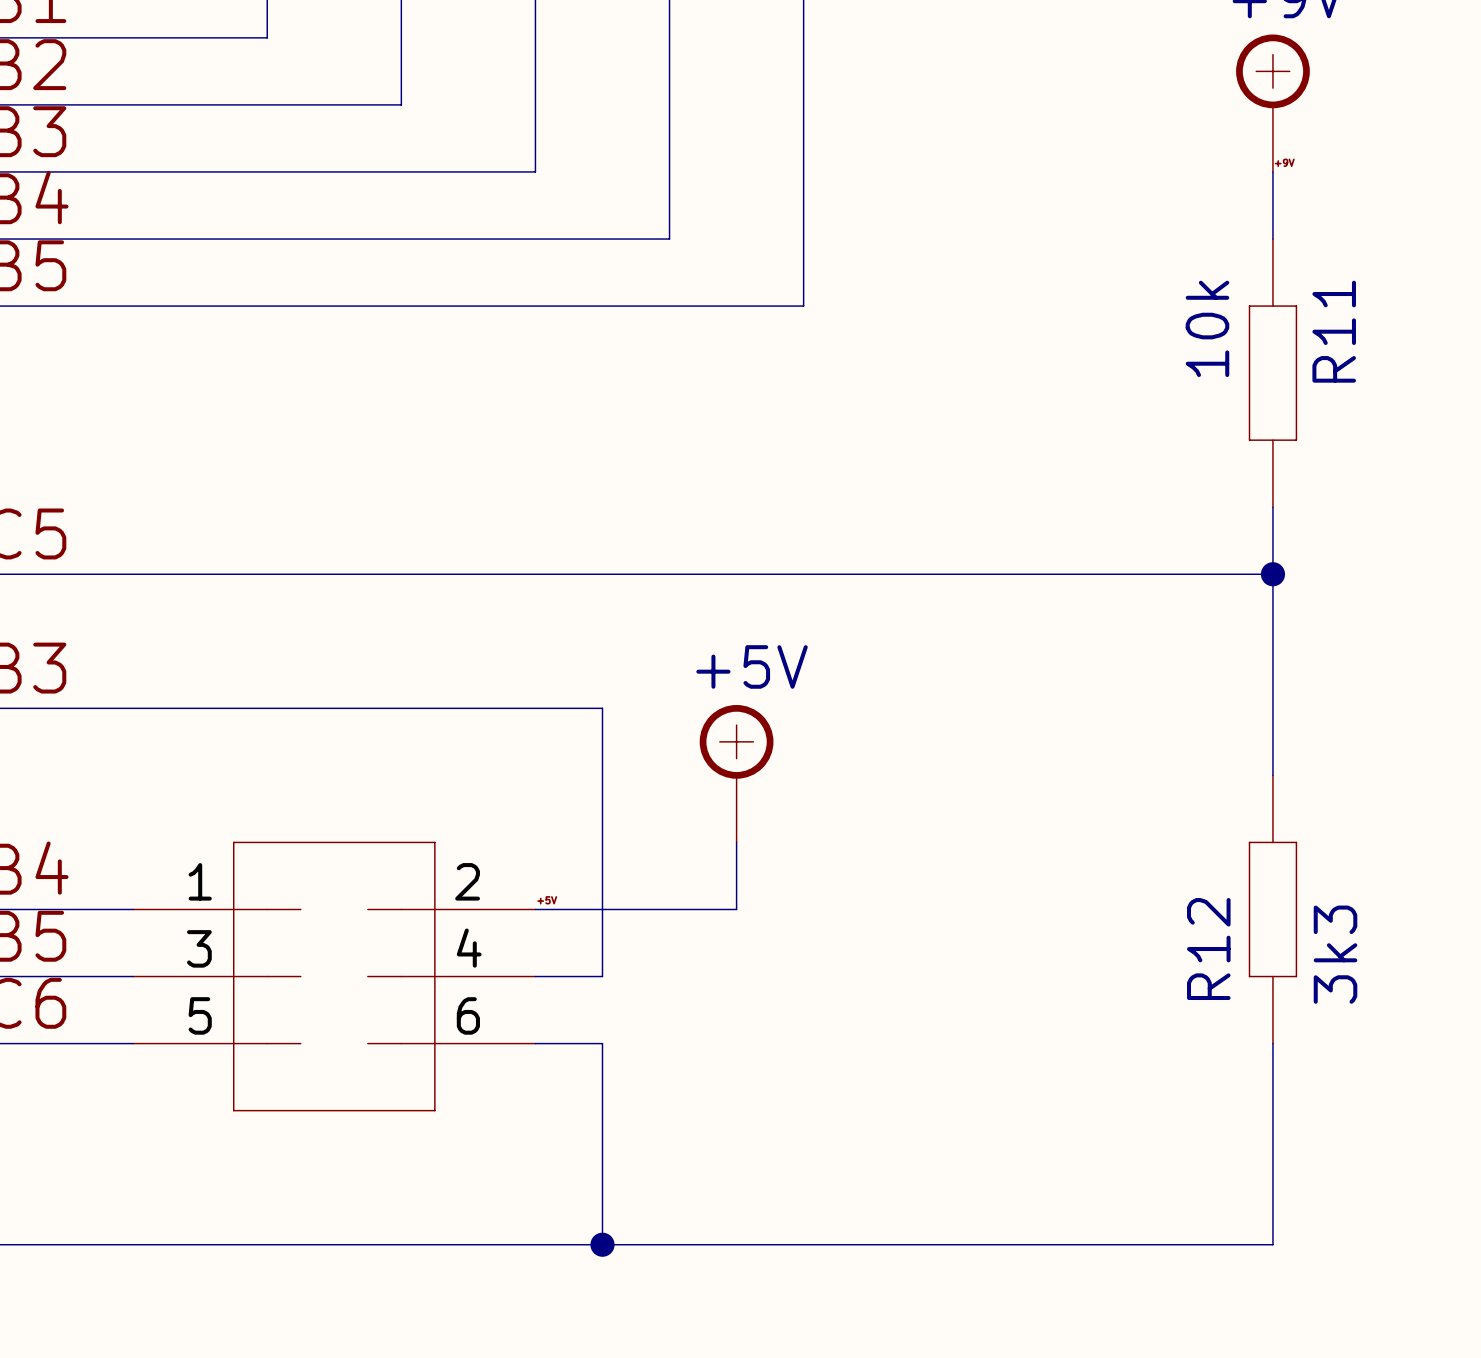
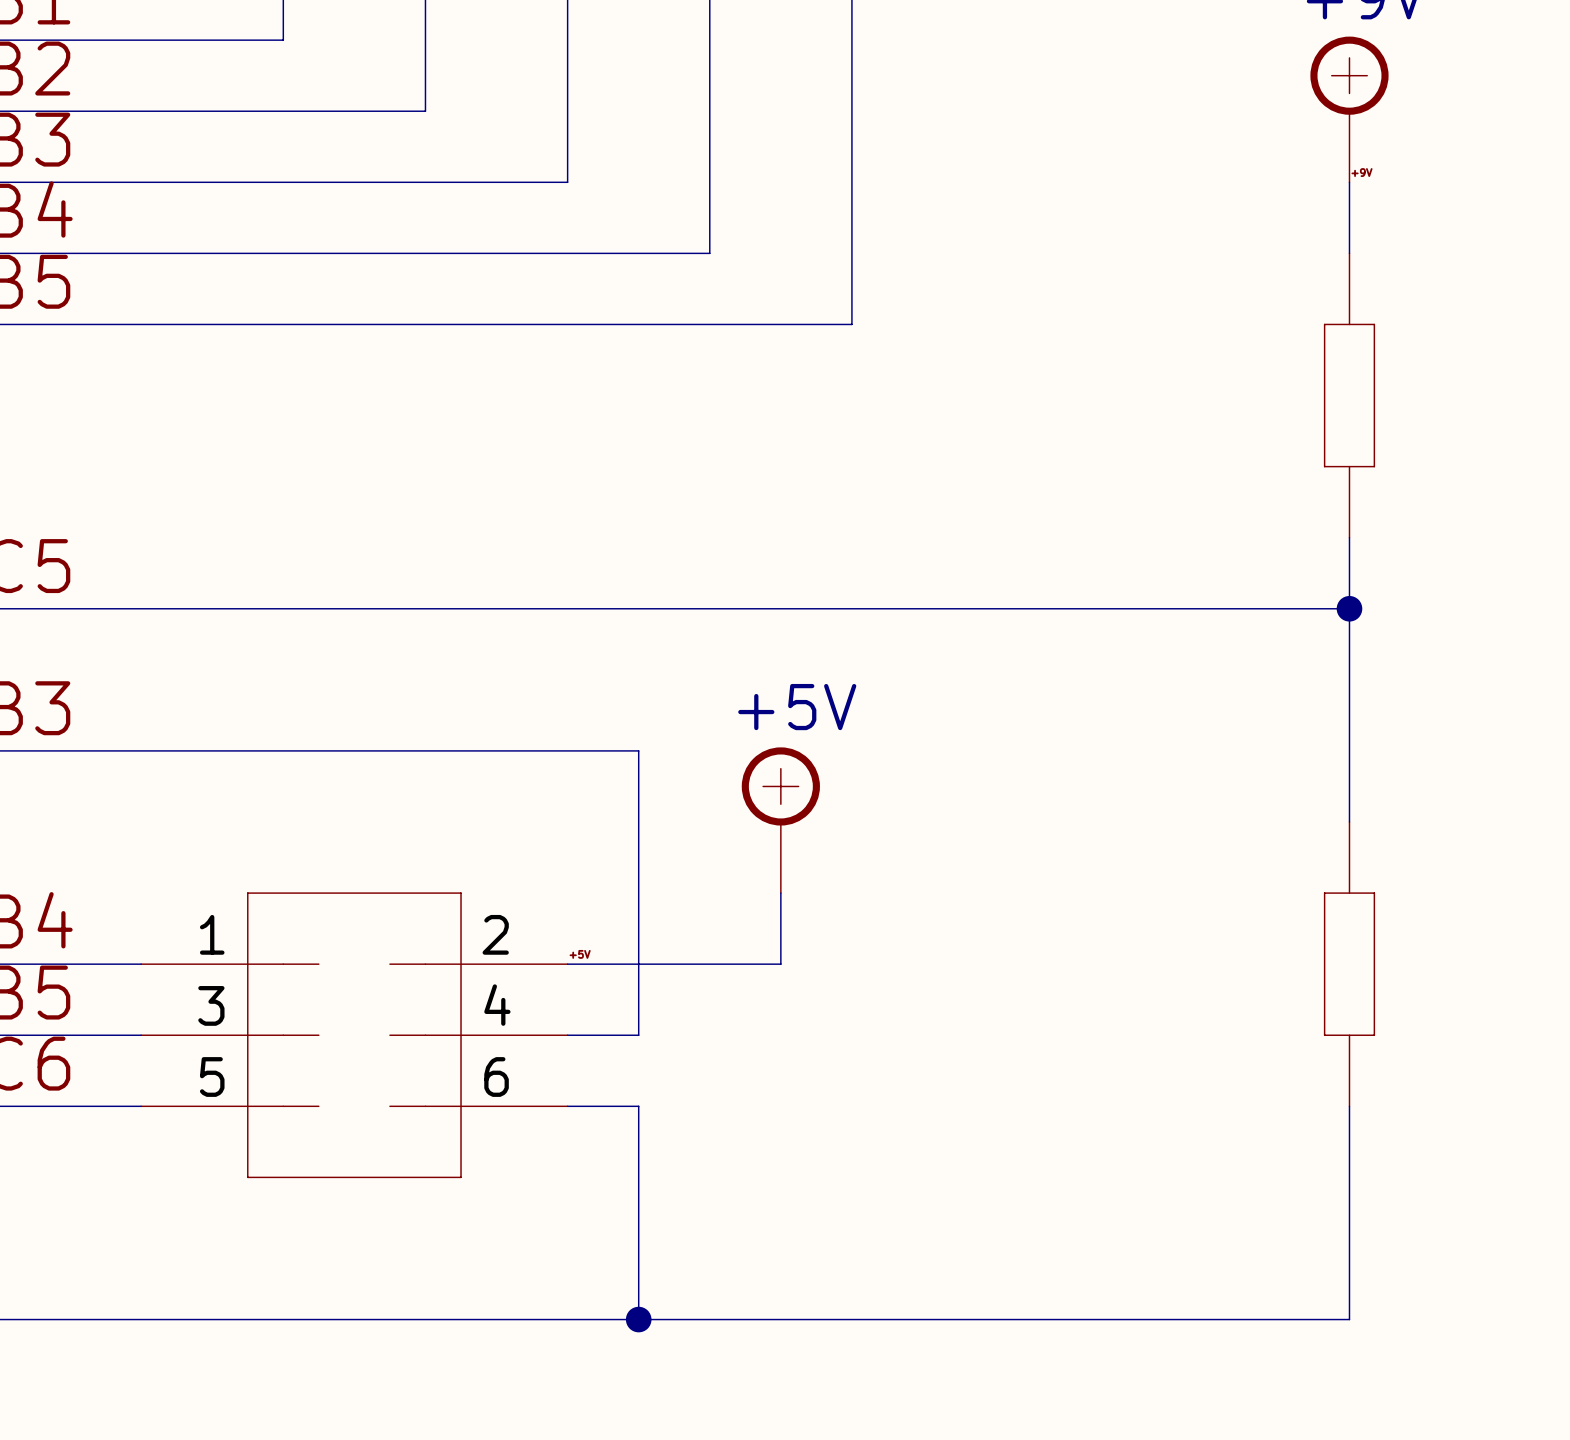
R11 value: 10k (1207, 328) -> none
R11 name: R11 (1334, 331) -> none
R12 name: R12 (1208, 949) -> none
R12 value: 3k3 (1335, 954) -> none

